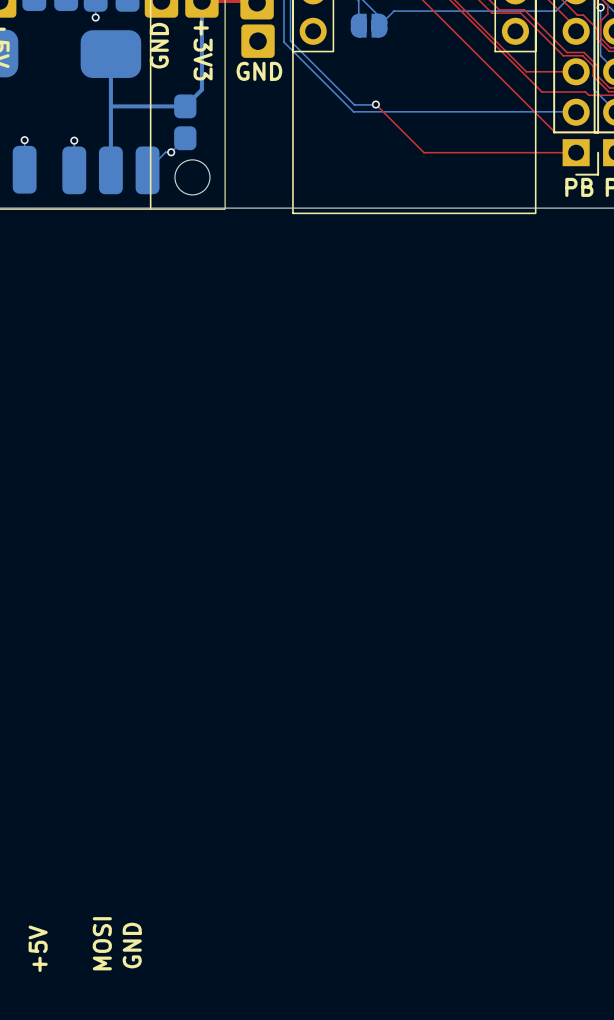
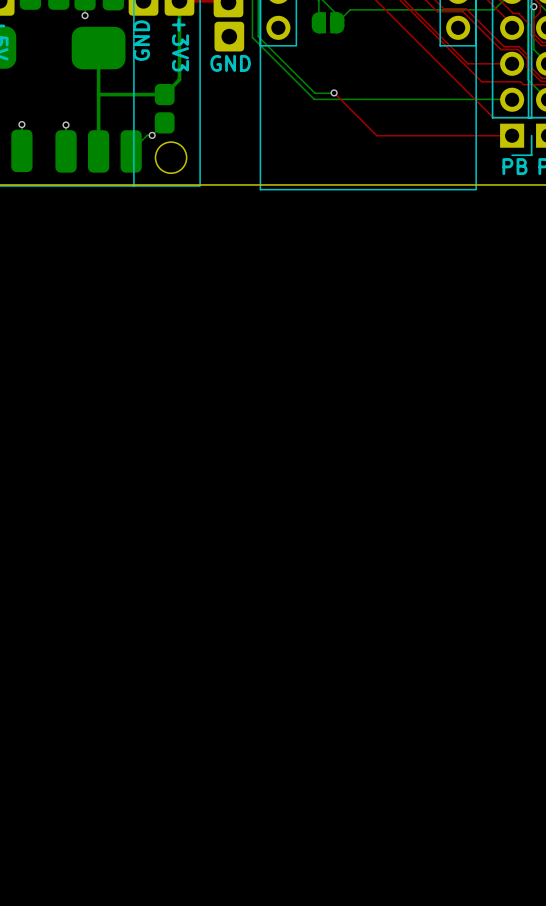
text: MOSI (102, 943) -> none
text: GND (132, 945) -> none
text: +5V (38, 948) -> none

